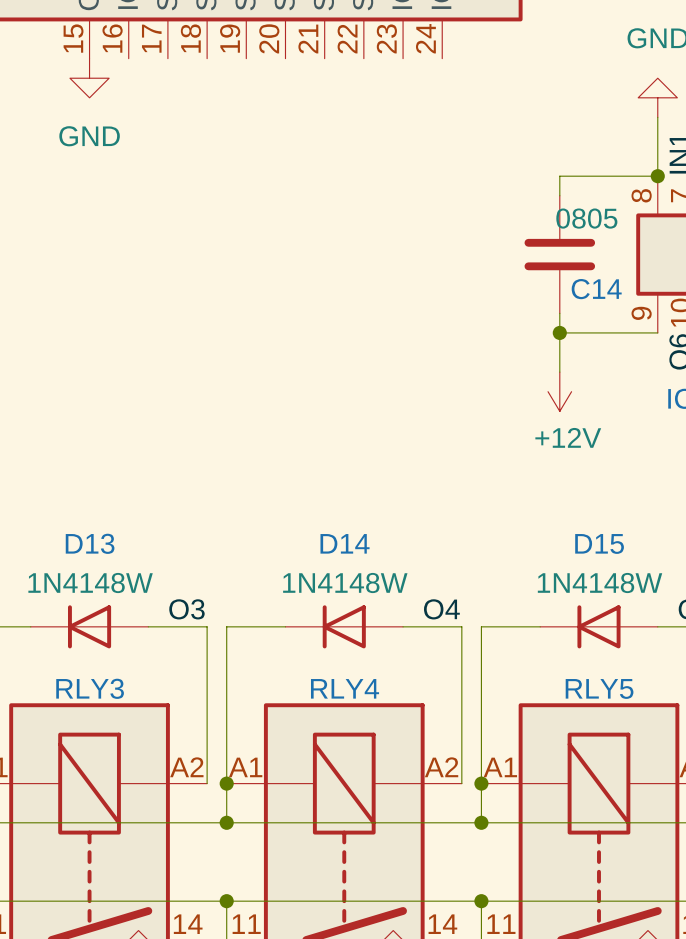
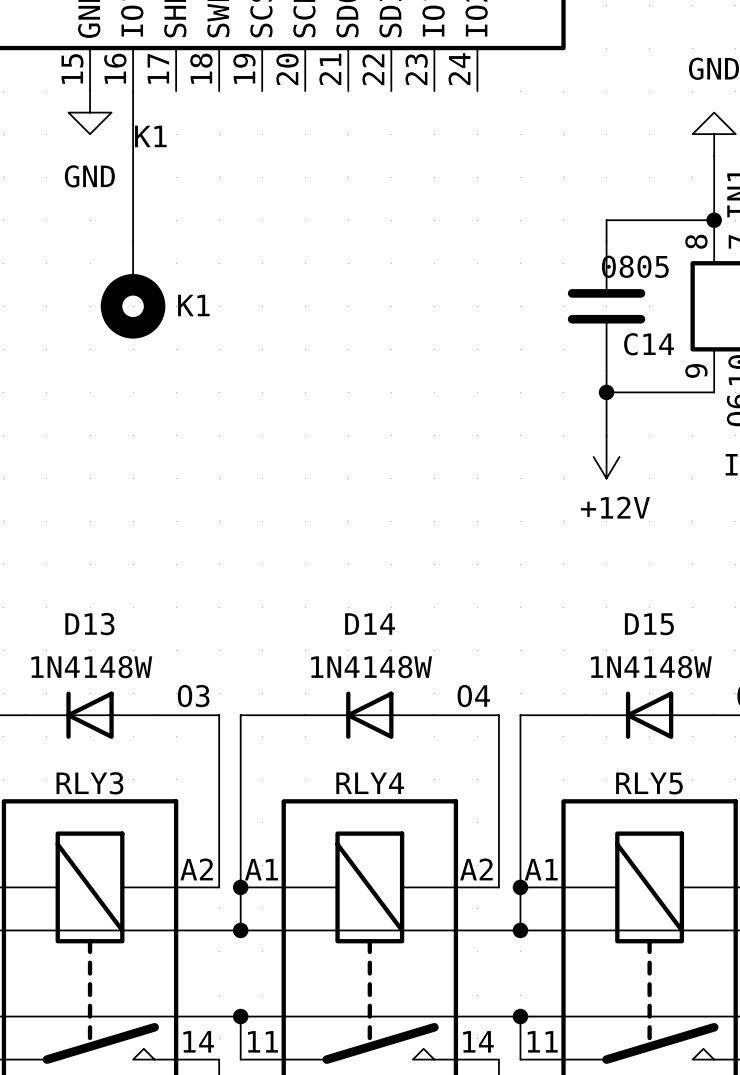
wire: none -> (133, 91) (133, 241)
label: none -> K1 (150, 136)
K1: none -> (133, 290)

